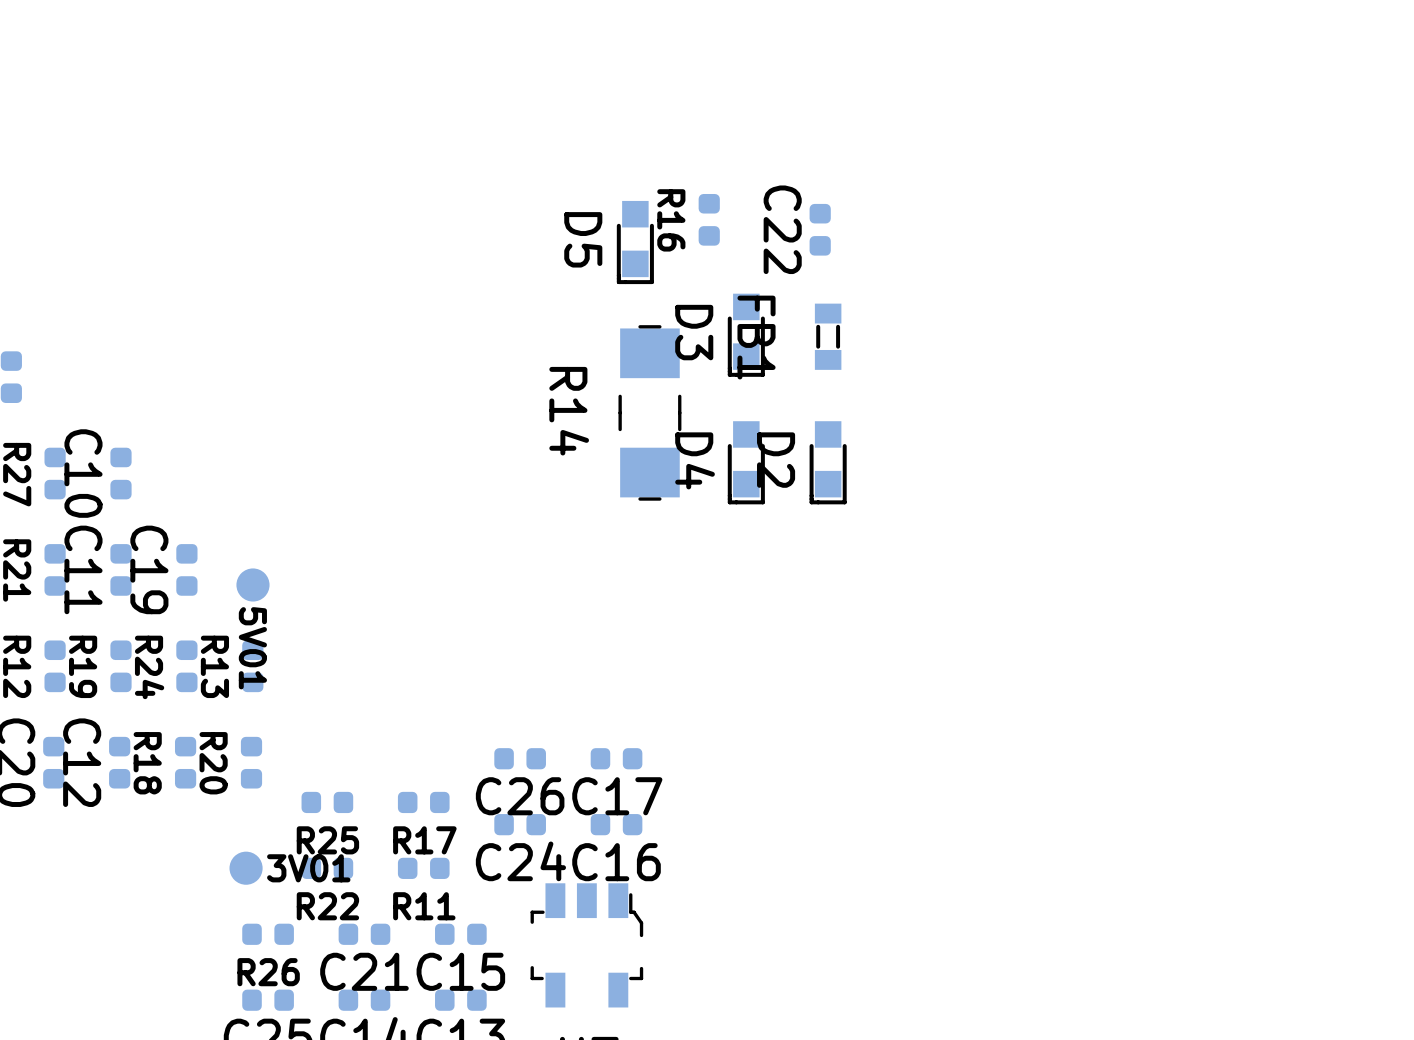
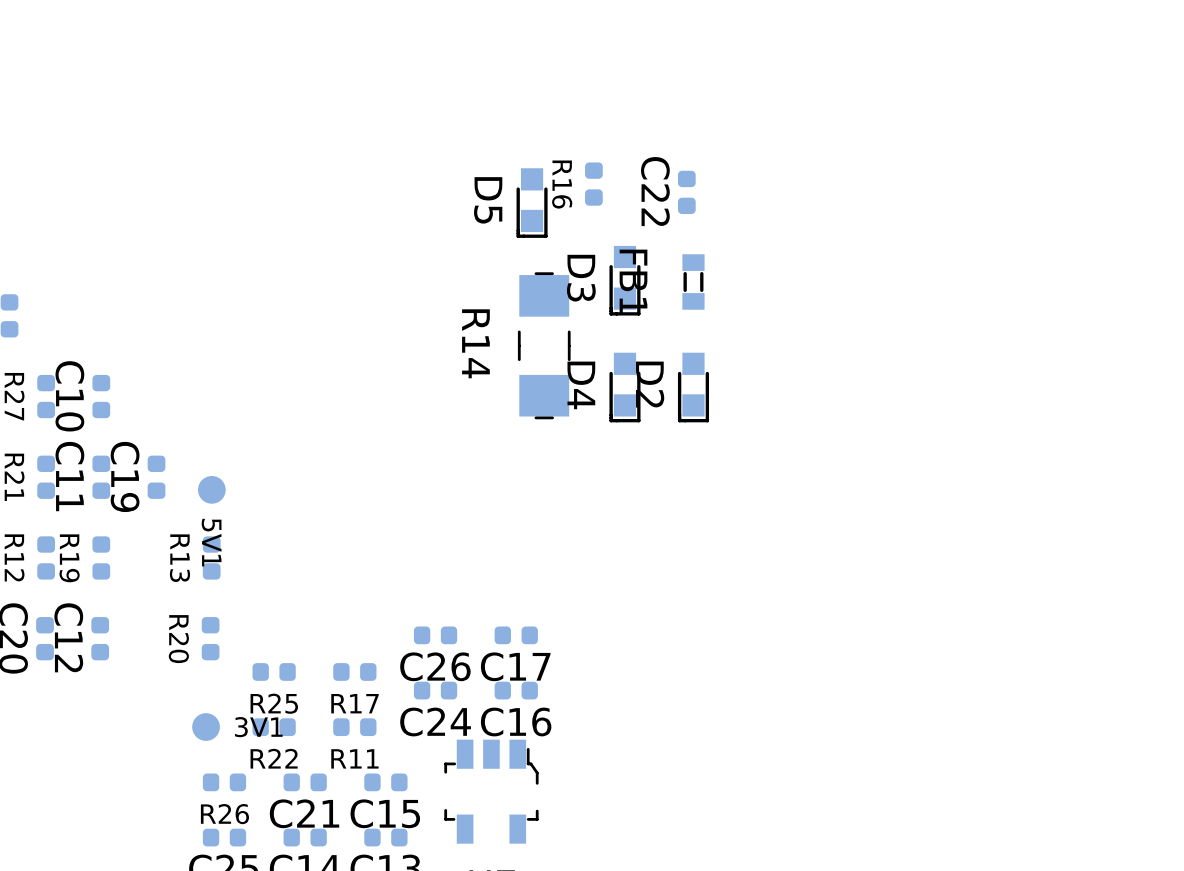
5V01 name: 5V01 (252, 648) -> 5V1 (211, 542)
R24: (186, 666) -> none
R18: (185, 762) -> none
3V01 name: 3V01 (308, 868) -> 3V1 (258, 727)

